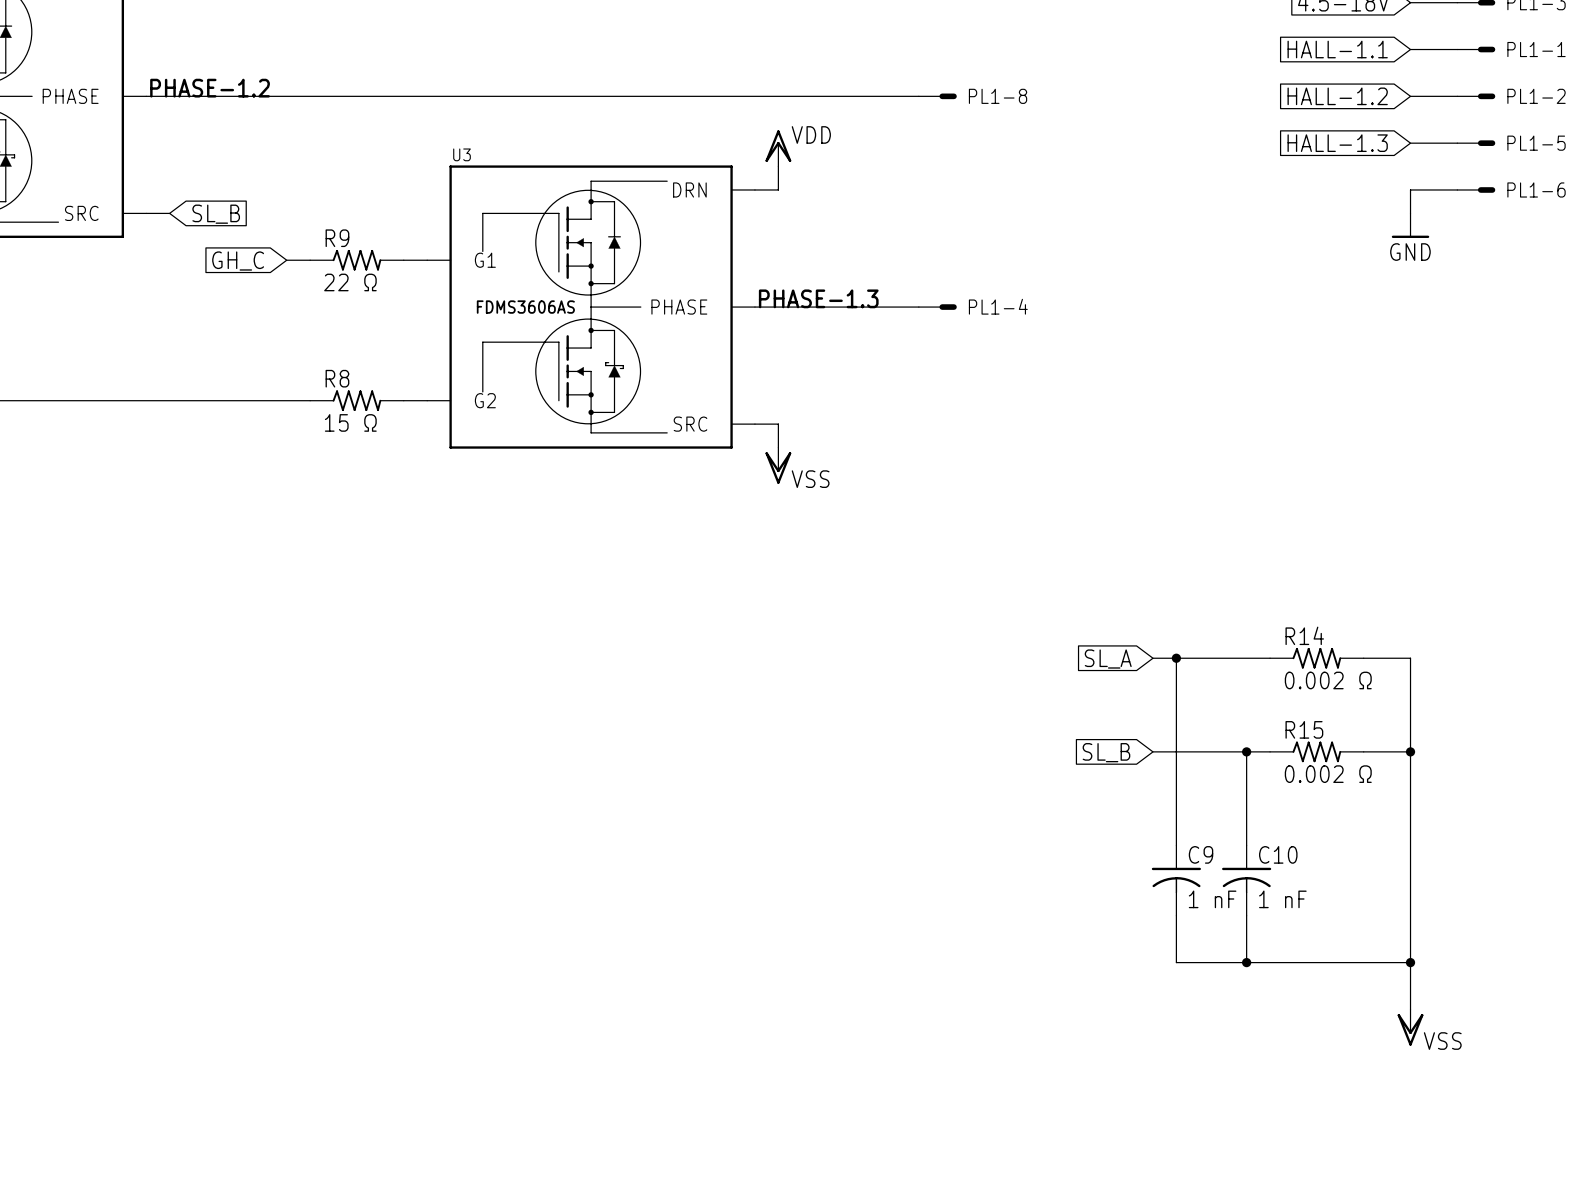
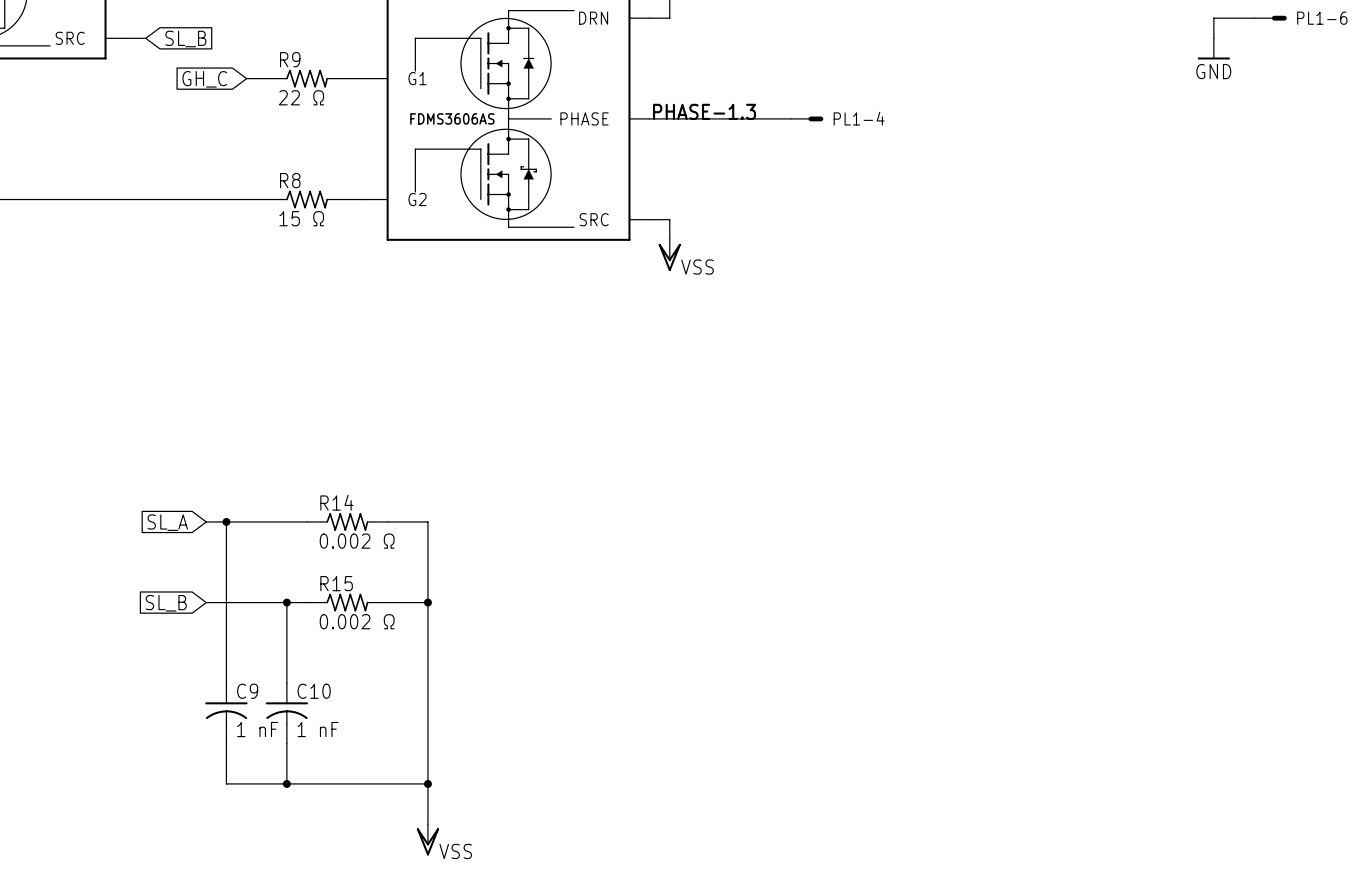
wire: (1152, 658) (1270, 658) -> none
wire: (1176, 658) (1176, 845) -> none
junction: (1176, 658) -> none
R14 position: (1316, 658) -> (347, 521)
wire: (1363, 658) (1410, 658) (1410, 1009) -> none
global label: SL_A (1108, 659) -> none
wire: (1152, 751) (1270, 751) -> none
wire: (1246, 751) (1246, 845) -> none
junction: (1246, 751) -> none
R15 position: (1316, 751) -> (347, 602)
wire: (1363, 751) (1410, 751) -> none
junction: (1410, 751) -> none
global label: SL_B (1106, 752) -> none
wire: none -> (206, 521) (307, 521)
wire: none -> (226, 521) (226, 683)
junction: none -> (226, 521)
wire: none -> (387, 521) (427, 521) (427, 824)
global label: none -> SL_A (167, 522)
wire: none -> (206, 602) (307, 602)
wire: none -> (286, 602) (286, 683)
junction: none -> (286, 602)
wire: none -> (387, 602) (427, 602)
junction: none -> (427, 602)
global label: none -> SL_B (166, 603)
C9 position: (1176, 880) -> (226, 713)
C10 position: (1246, 880) -> (286, 713)
wire: (1176, 915) (1176, 962) (1410, 962) -> none
wire: (1246, 915) (1246, 962) -> none
junction: (1246, 962) -> none
junction: (1410, 962) -> none
power symbol: VSS (1410, 1027) -> none
wire: none -> (226, 743) (226, 783) (427, 783)
wire: none -> (286, 743) (286, 783)
junction: none -> (286, 783)
junction: none -> (427, 783)
power symbol: none -> VSS (427, 839)

